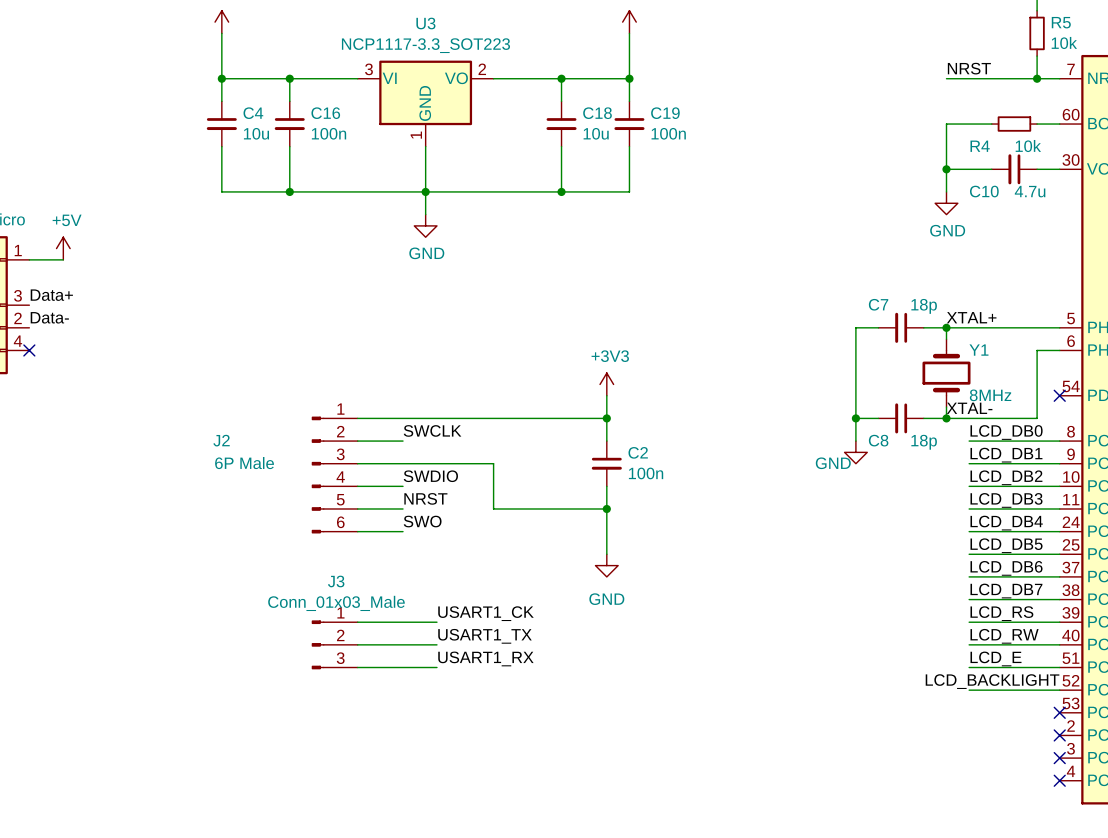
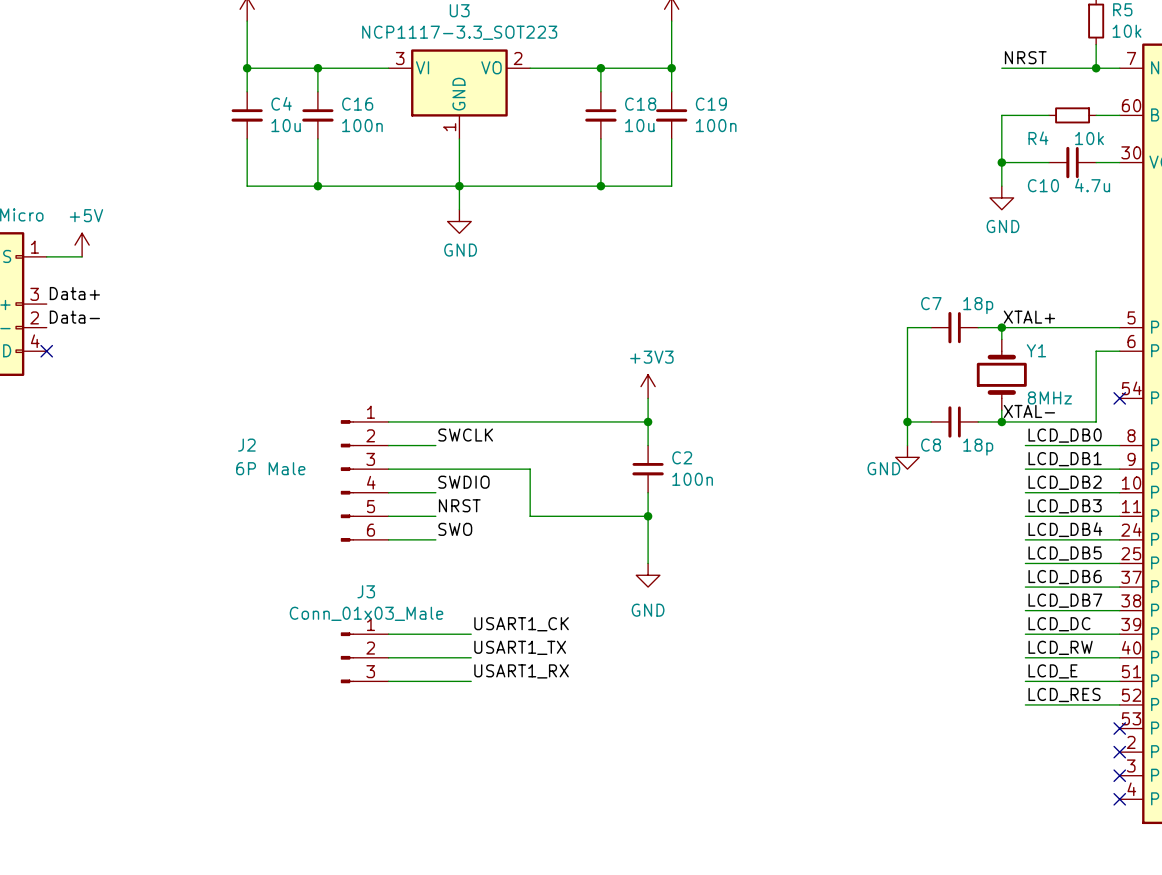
label: LCD_RS (1001, 613) -> LCD_DC (1059, 624)
label: LCD_BACKLIGHT (992, 681) -> none
label: none -> LCD_RES (1064, 695)

